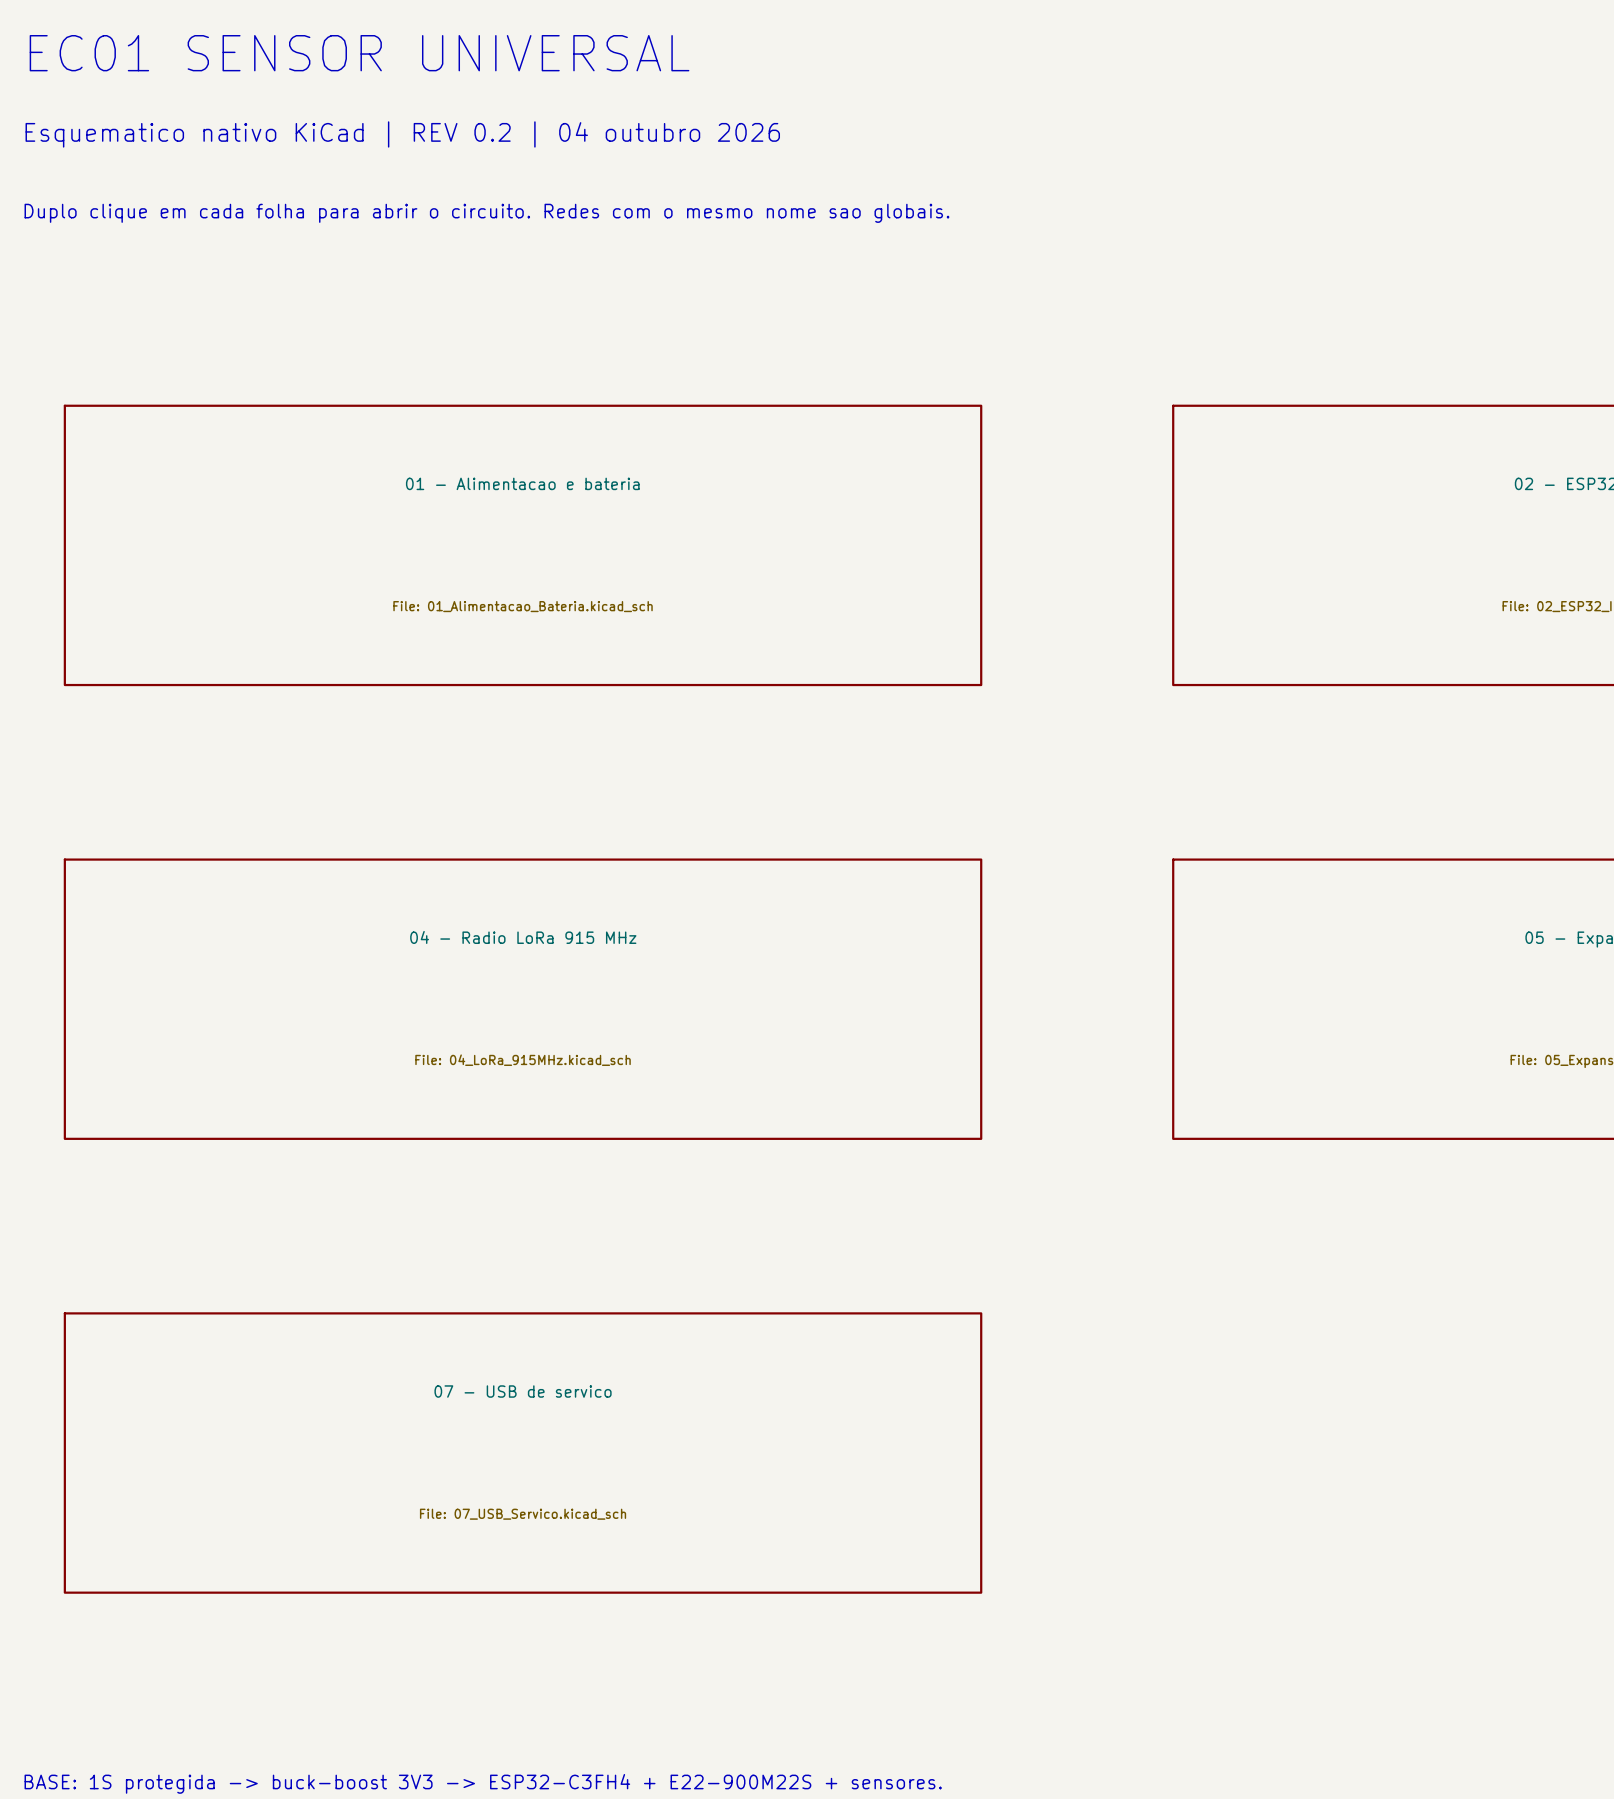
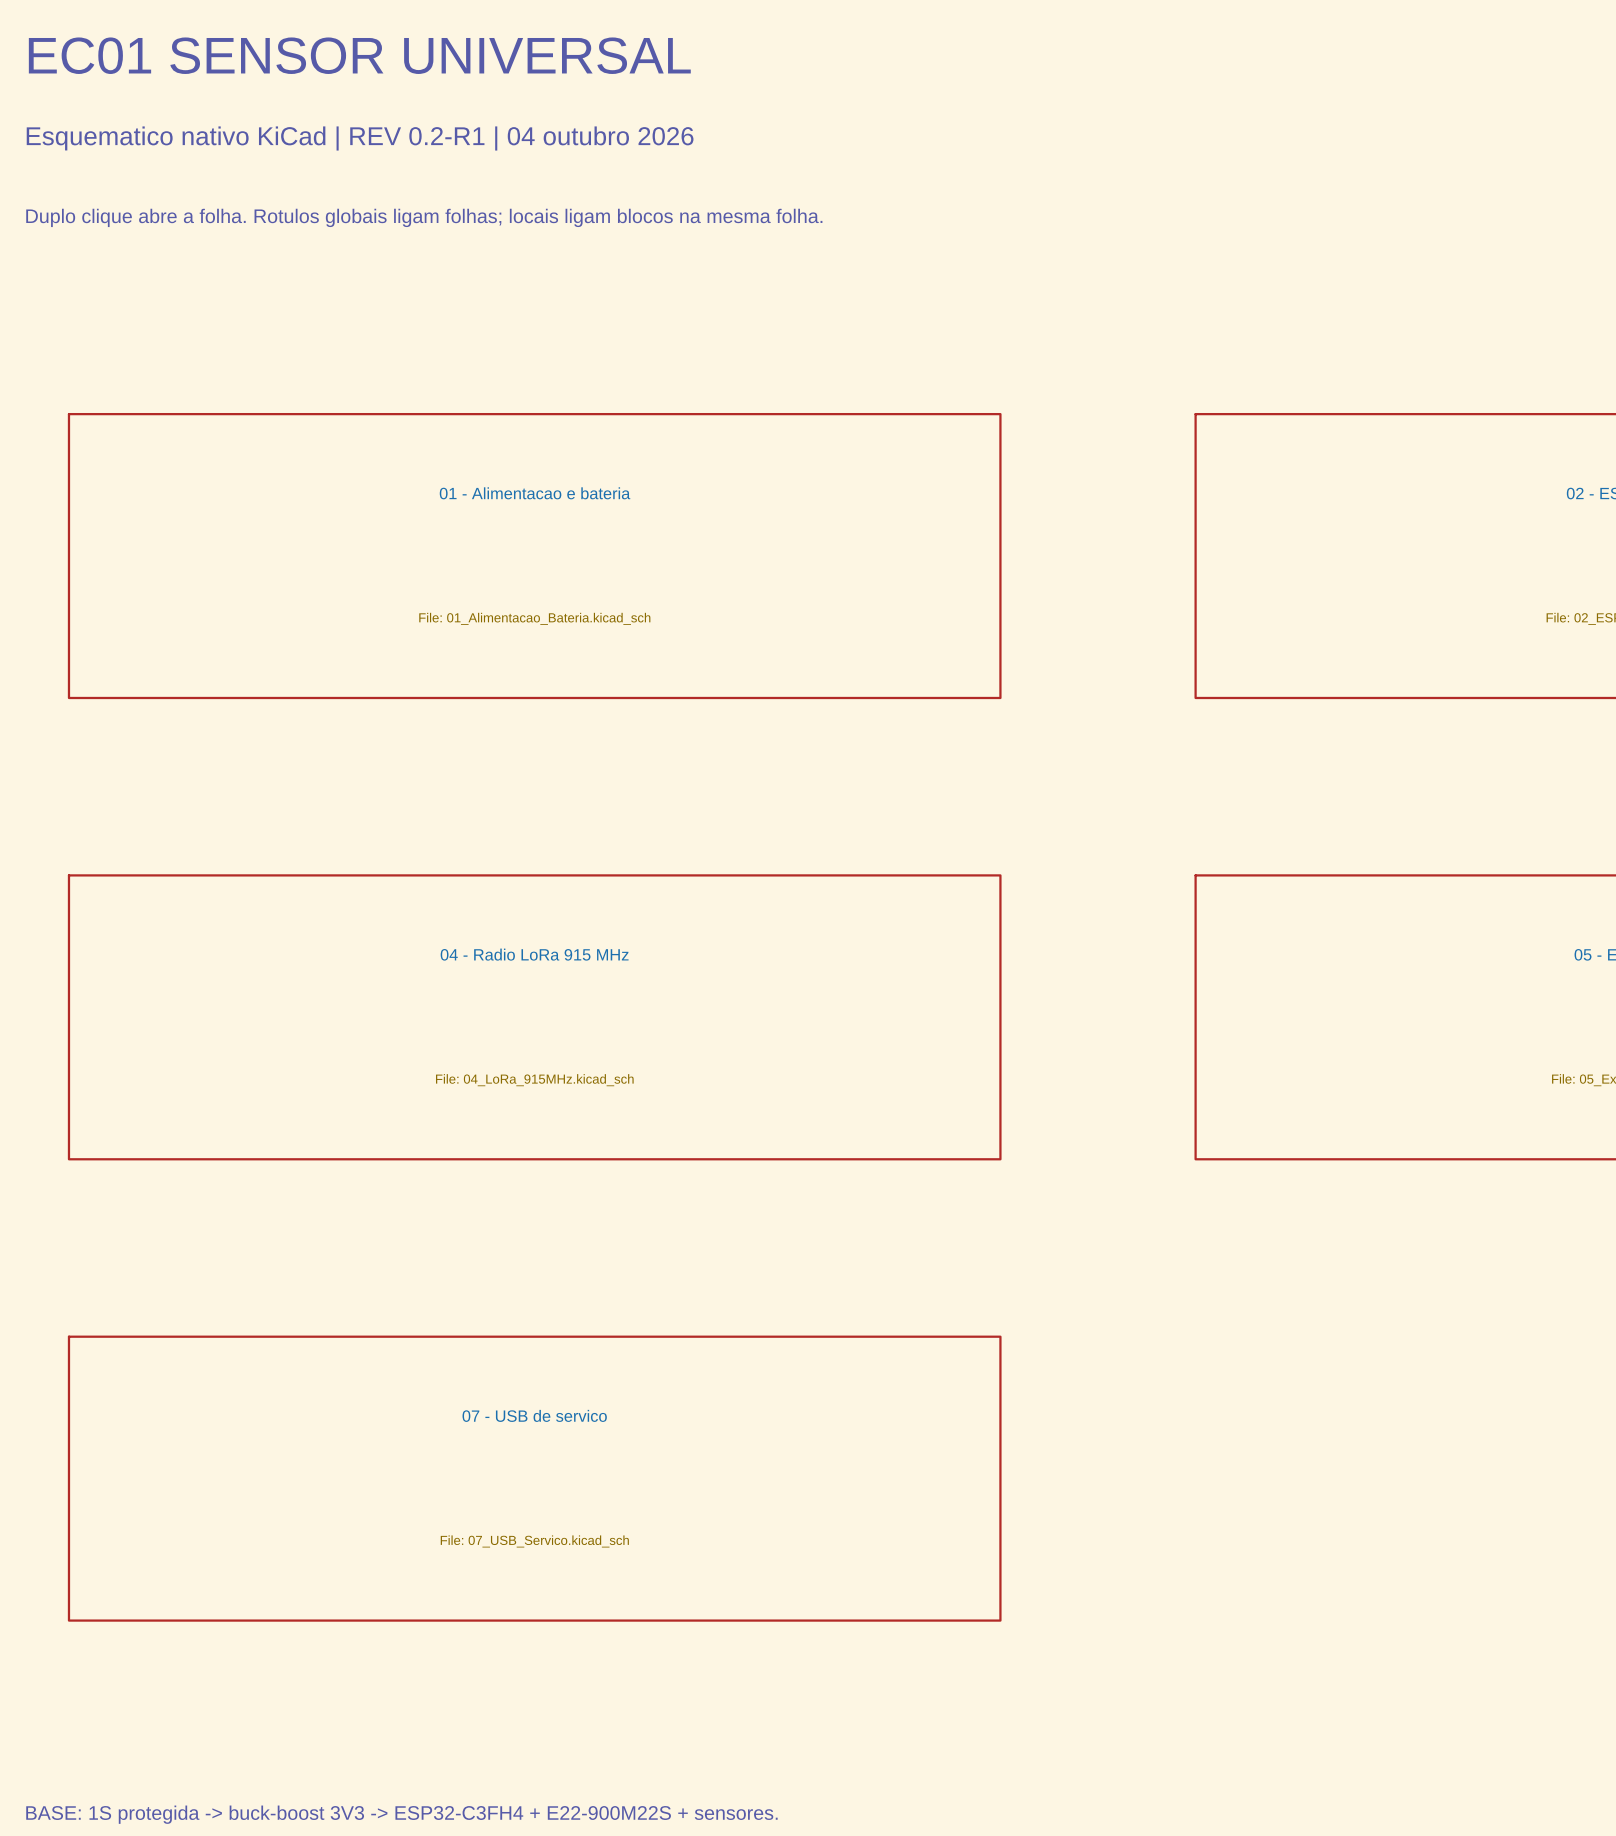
text: Esquematico nativo KiCad | REV 0.2 | 04 outubro 2026 (402, 134) -> Esquematico nativo KiCad | REV 0.2-R1 | 04 outubro 2026 (360, 138)
text: Duplo clique em cada folha para abrir o circuito. Redes com o mesmo nome sao globais. (486, 213) -> Duplo clique abre a folha. Rotulos globais ligam folhas; locais ligam blocos na mesma folha. (424, 217)

